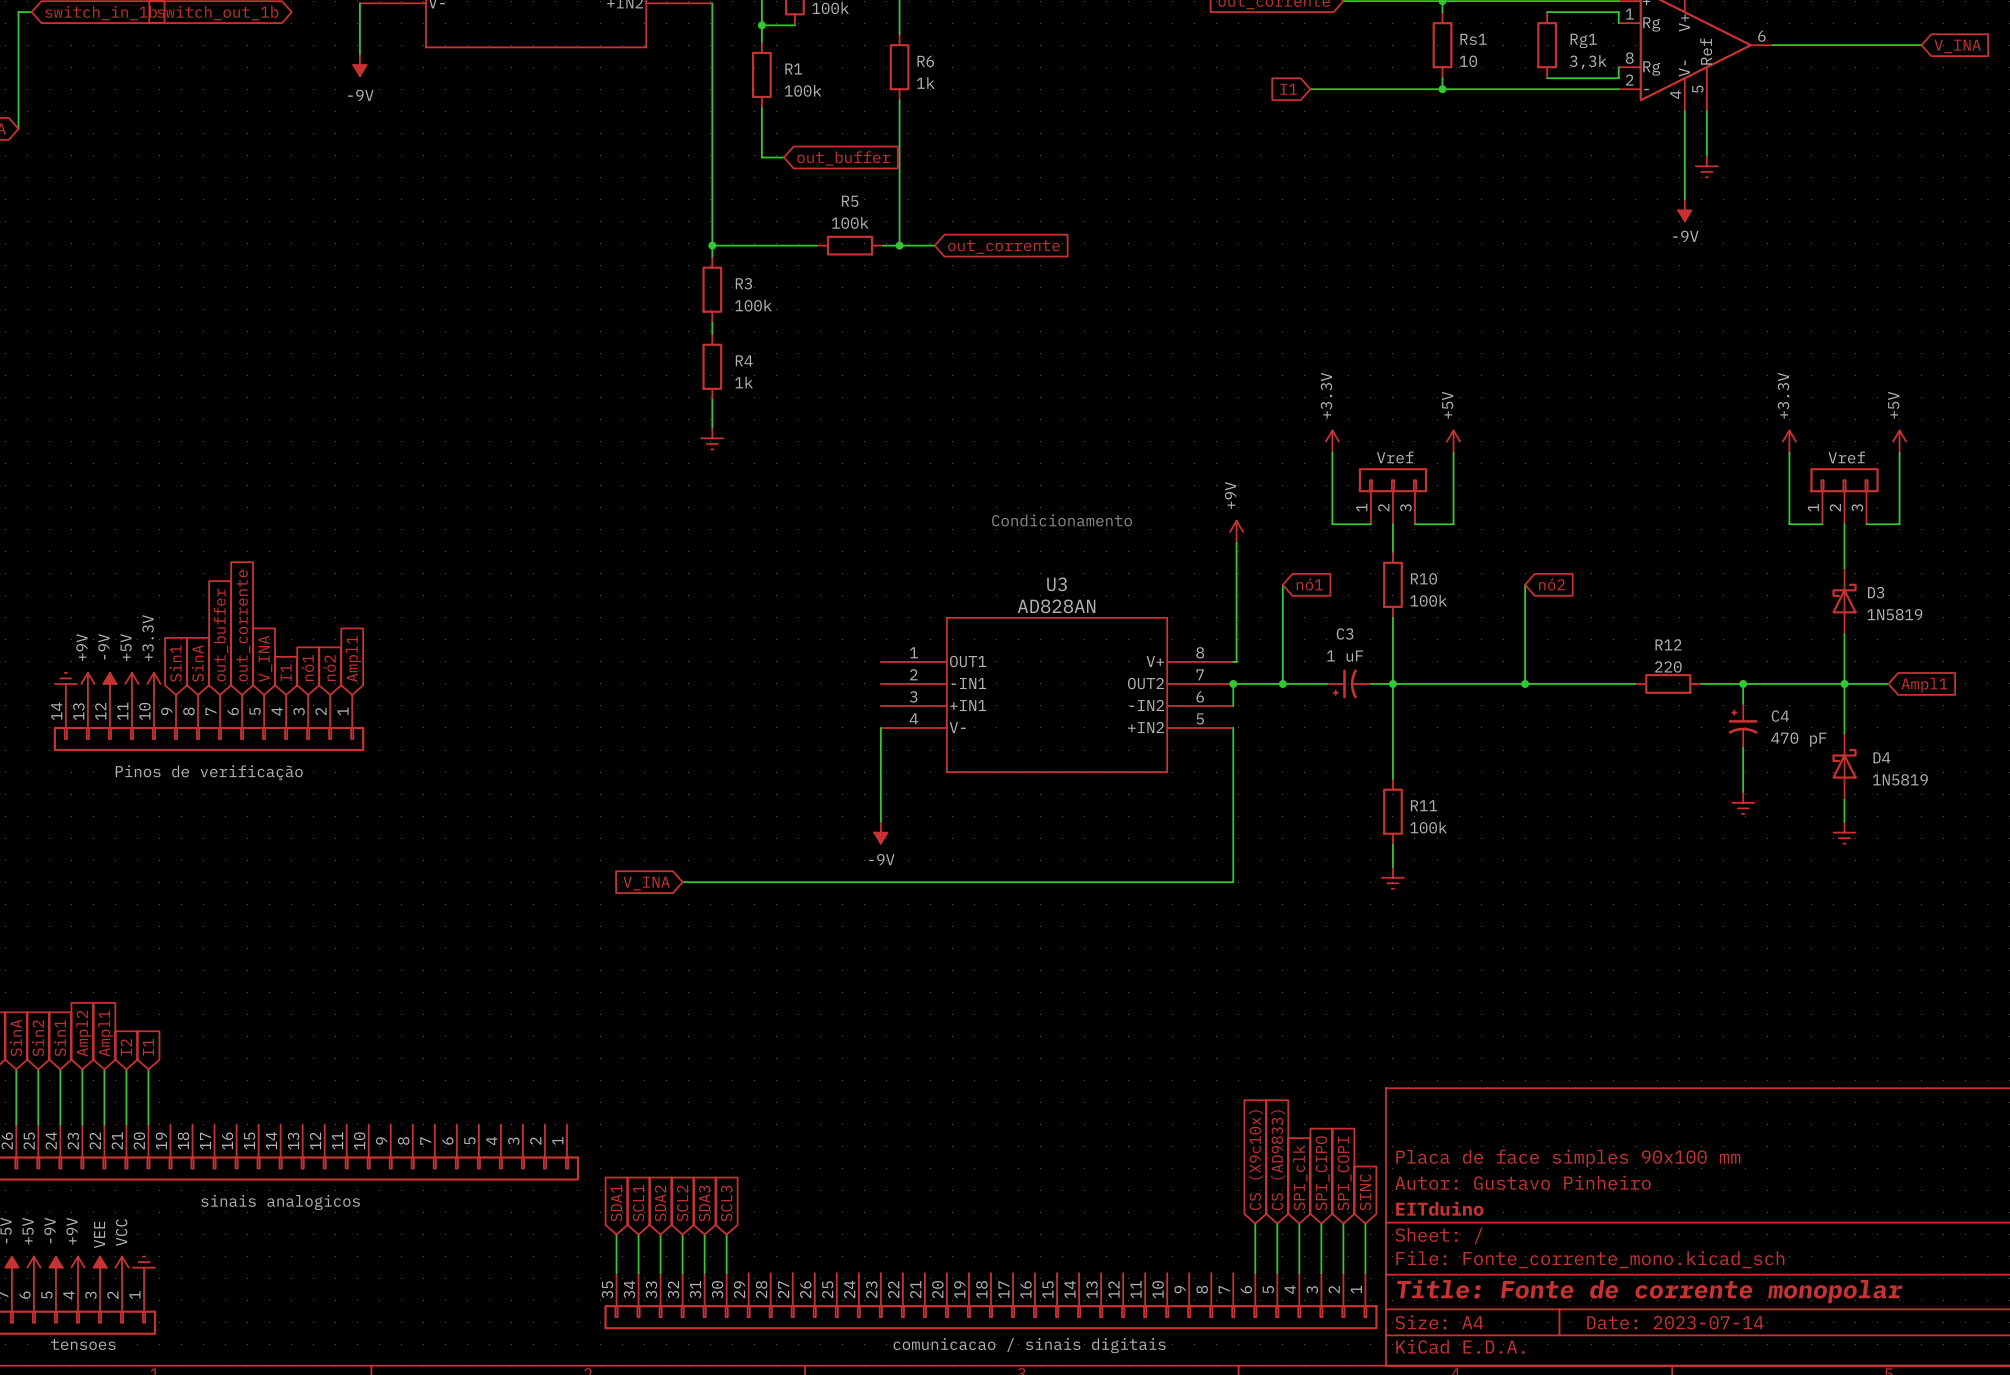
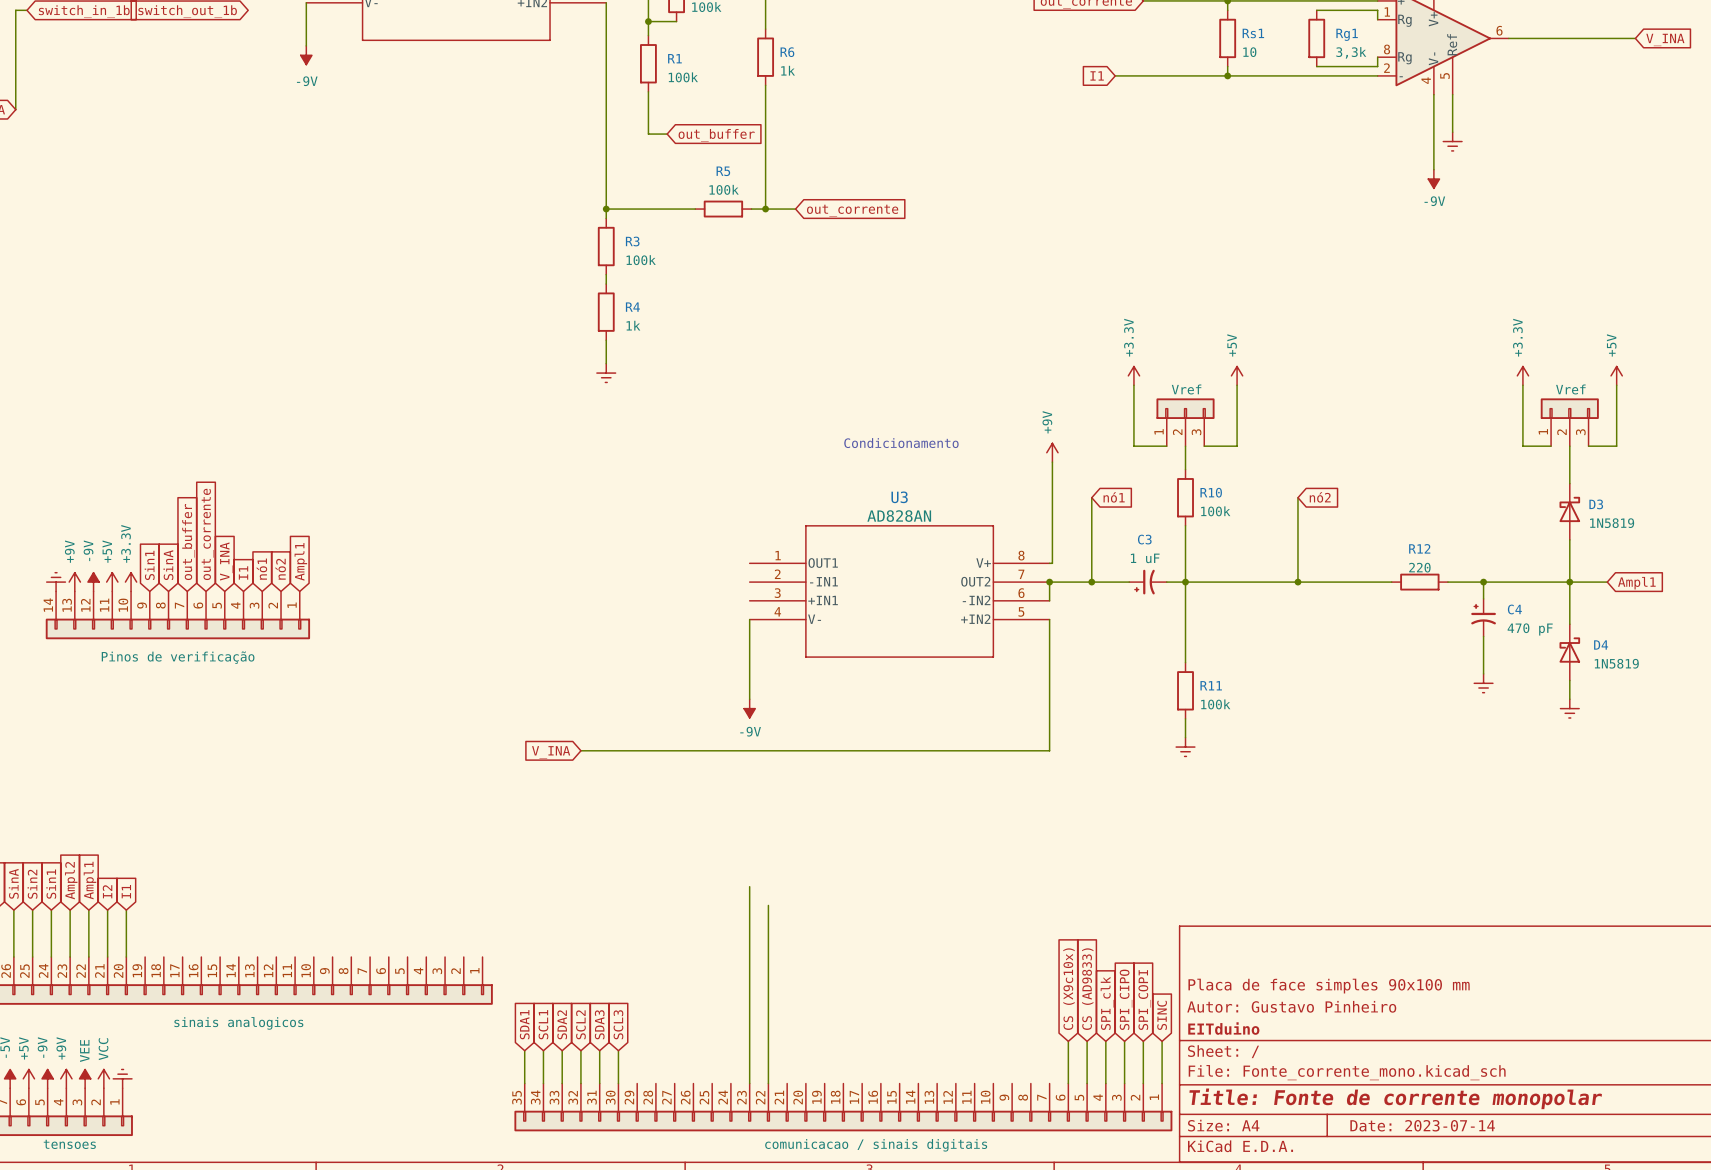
wire: none -> (749, 886) (749, 1083)
wire: none -> (768, 905) (768, 1083)

